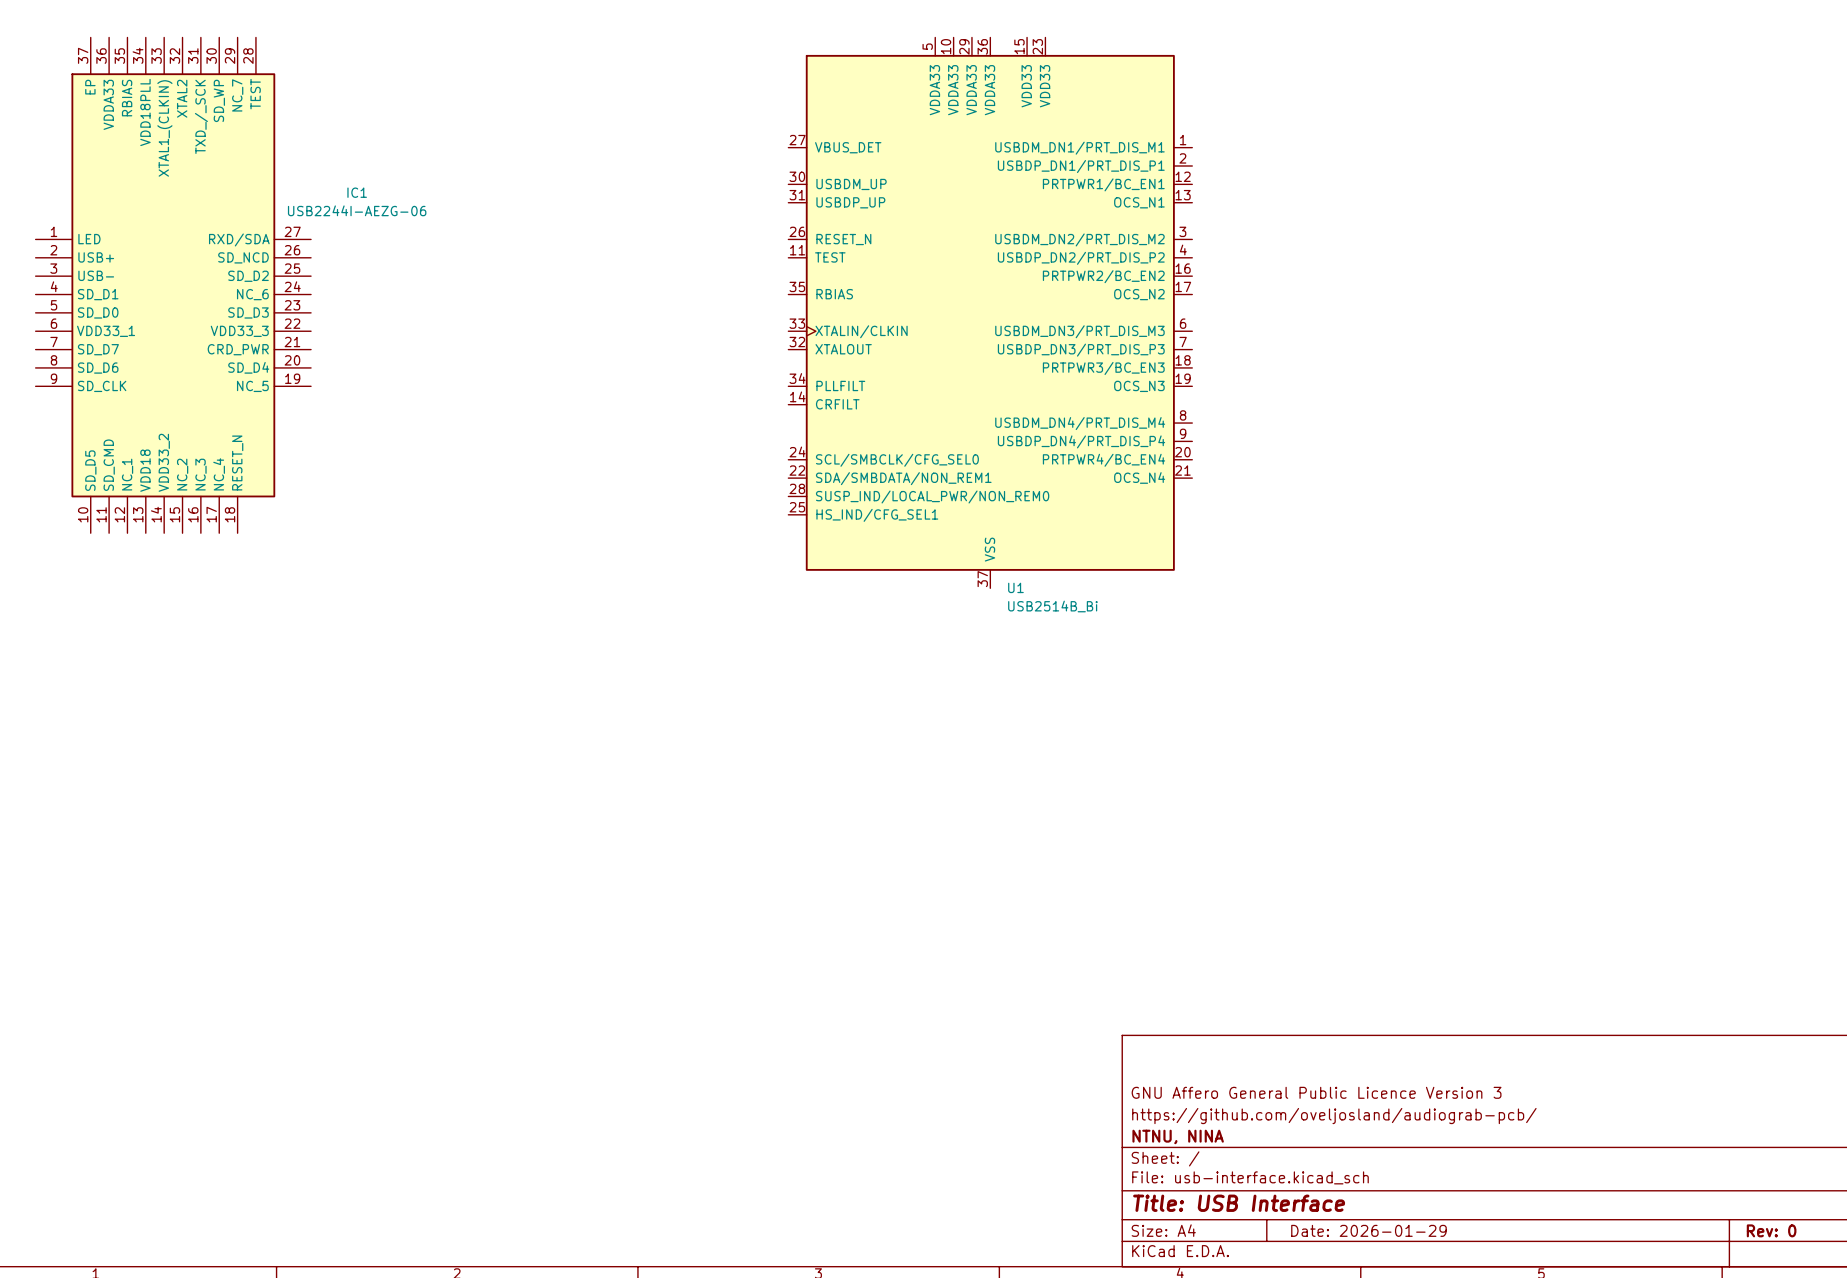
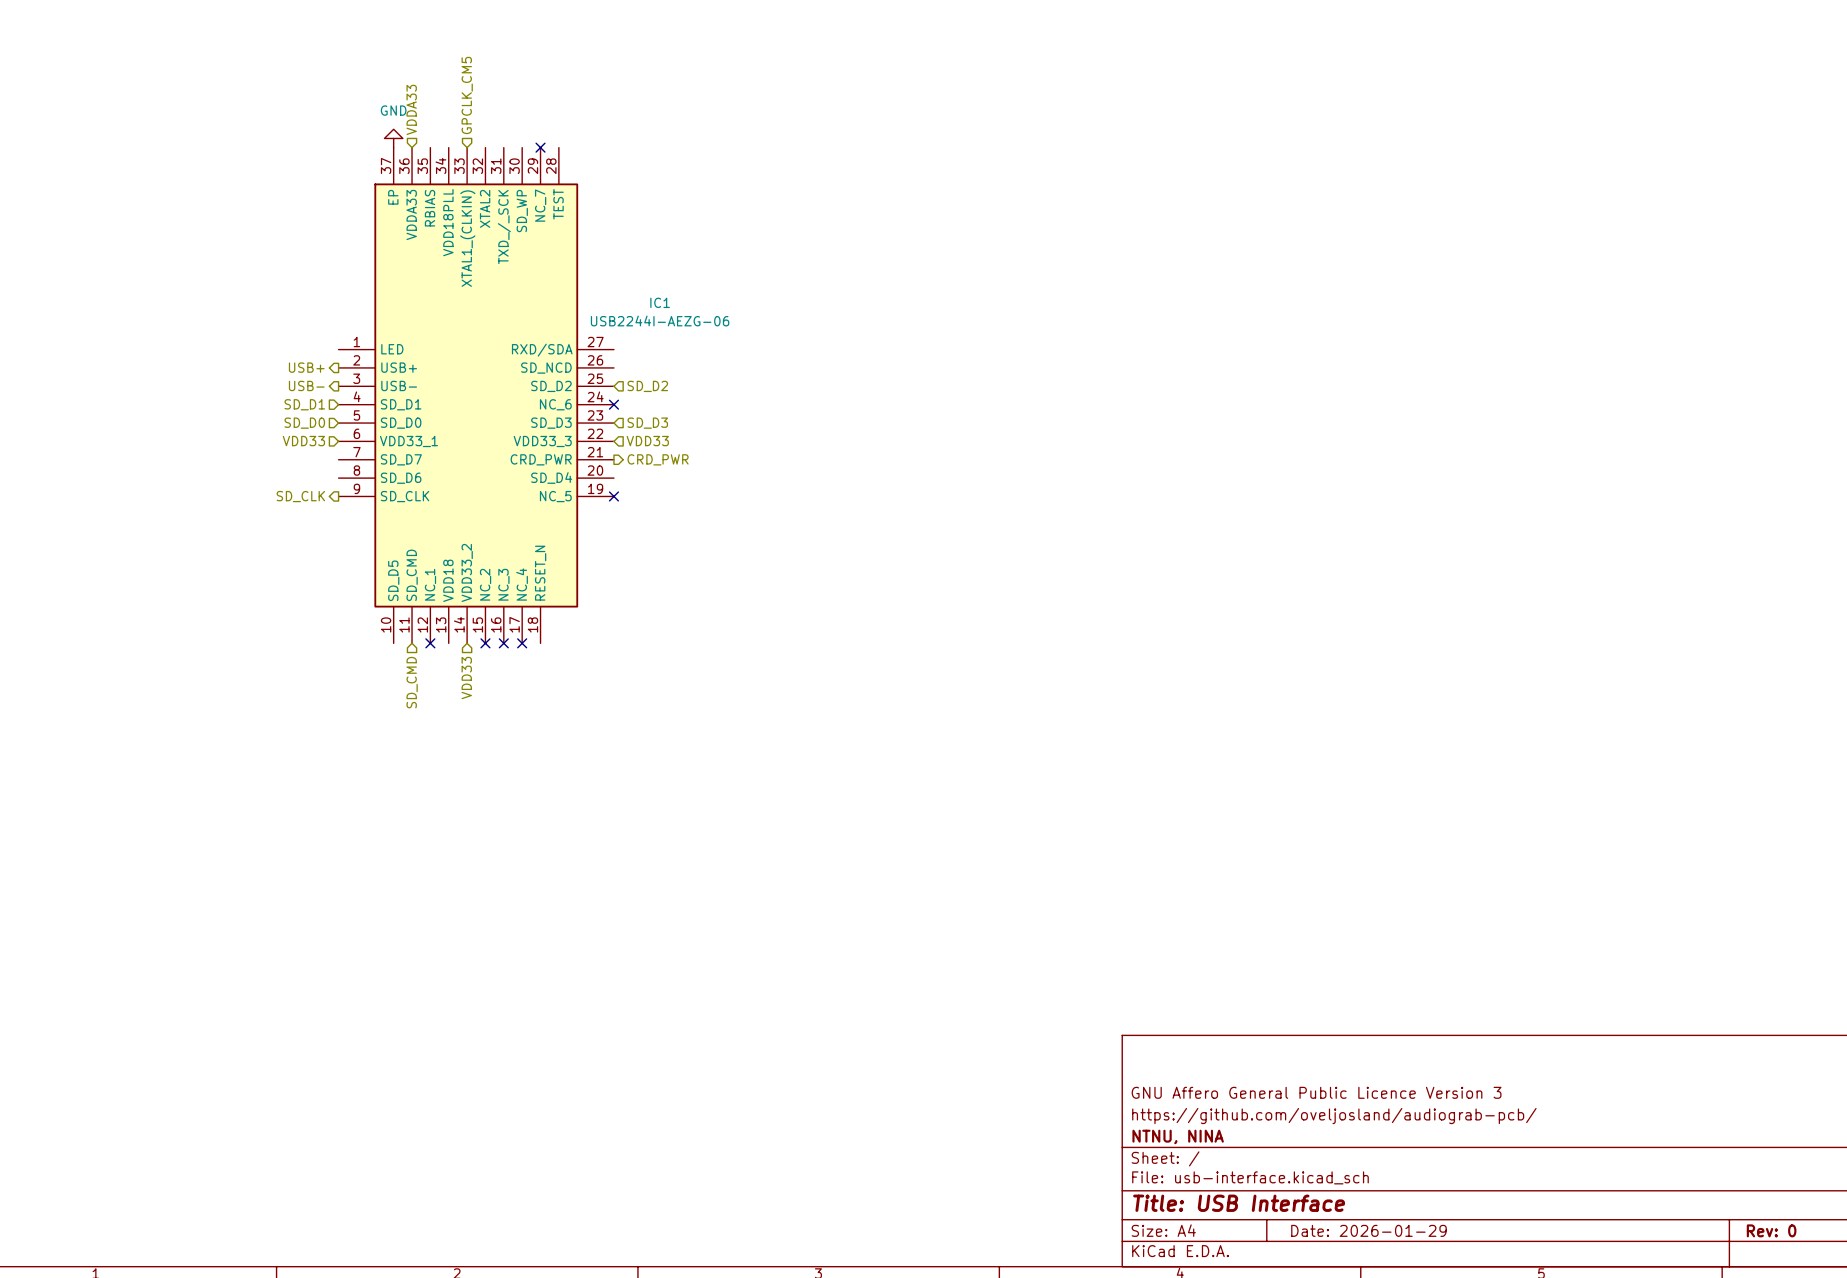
hierarchical label: none -> GPCLK_CM5 (467, 95)
hierarchical label: none -> VDDA33 (411, 109)
power symbol: none -> GND (393, 138)
no-connect mark: none -> (540, 147)
IC1 position: (173, 285) -> (476, 395)
U1: USB2514B_Bi (990, 312) -> none
hierarchical label: none -> USB+ (306, 367)
hierarchical label: none -> USB- (306, 385)
hierarchical label: none -> SD_D2 (647, 386)
hierarchical label: none -> SD_D1 (304, 404)
no-connect mark: none -> (613, 404)
hierarchical label: none -> SD_D0 (304, 423)
hierarchical label: none -> SD_D3 (647, 423)
hierarchical label: none -> VDD33 (303, 441)
hierarchical label: none -> VDD33 (647, 441)
hierarchical label: none -> CRD_PWR (658, 459)
hierarchical label: none -> SD_CLK (300, 496)
no-connect mark: none -> (613, 496)
no-connect mark: none -> (430, 643)
no-connect mark: none -> (485, 643)
no-connect mark: none -> (503, 643)
no-connect mark: none -> (522, 643)
hierarchical label: none -> VDD33 (466, 678)
hierarchical label: none -> SD_CMD (412, 682)

